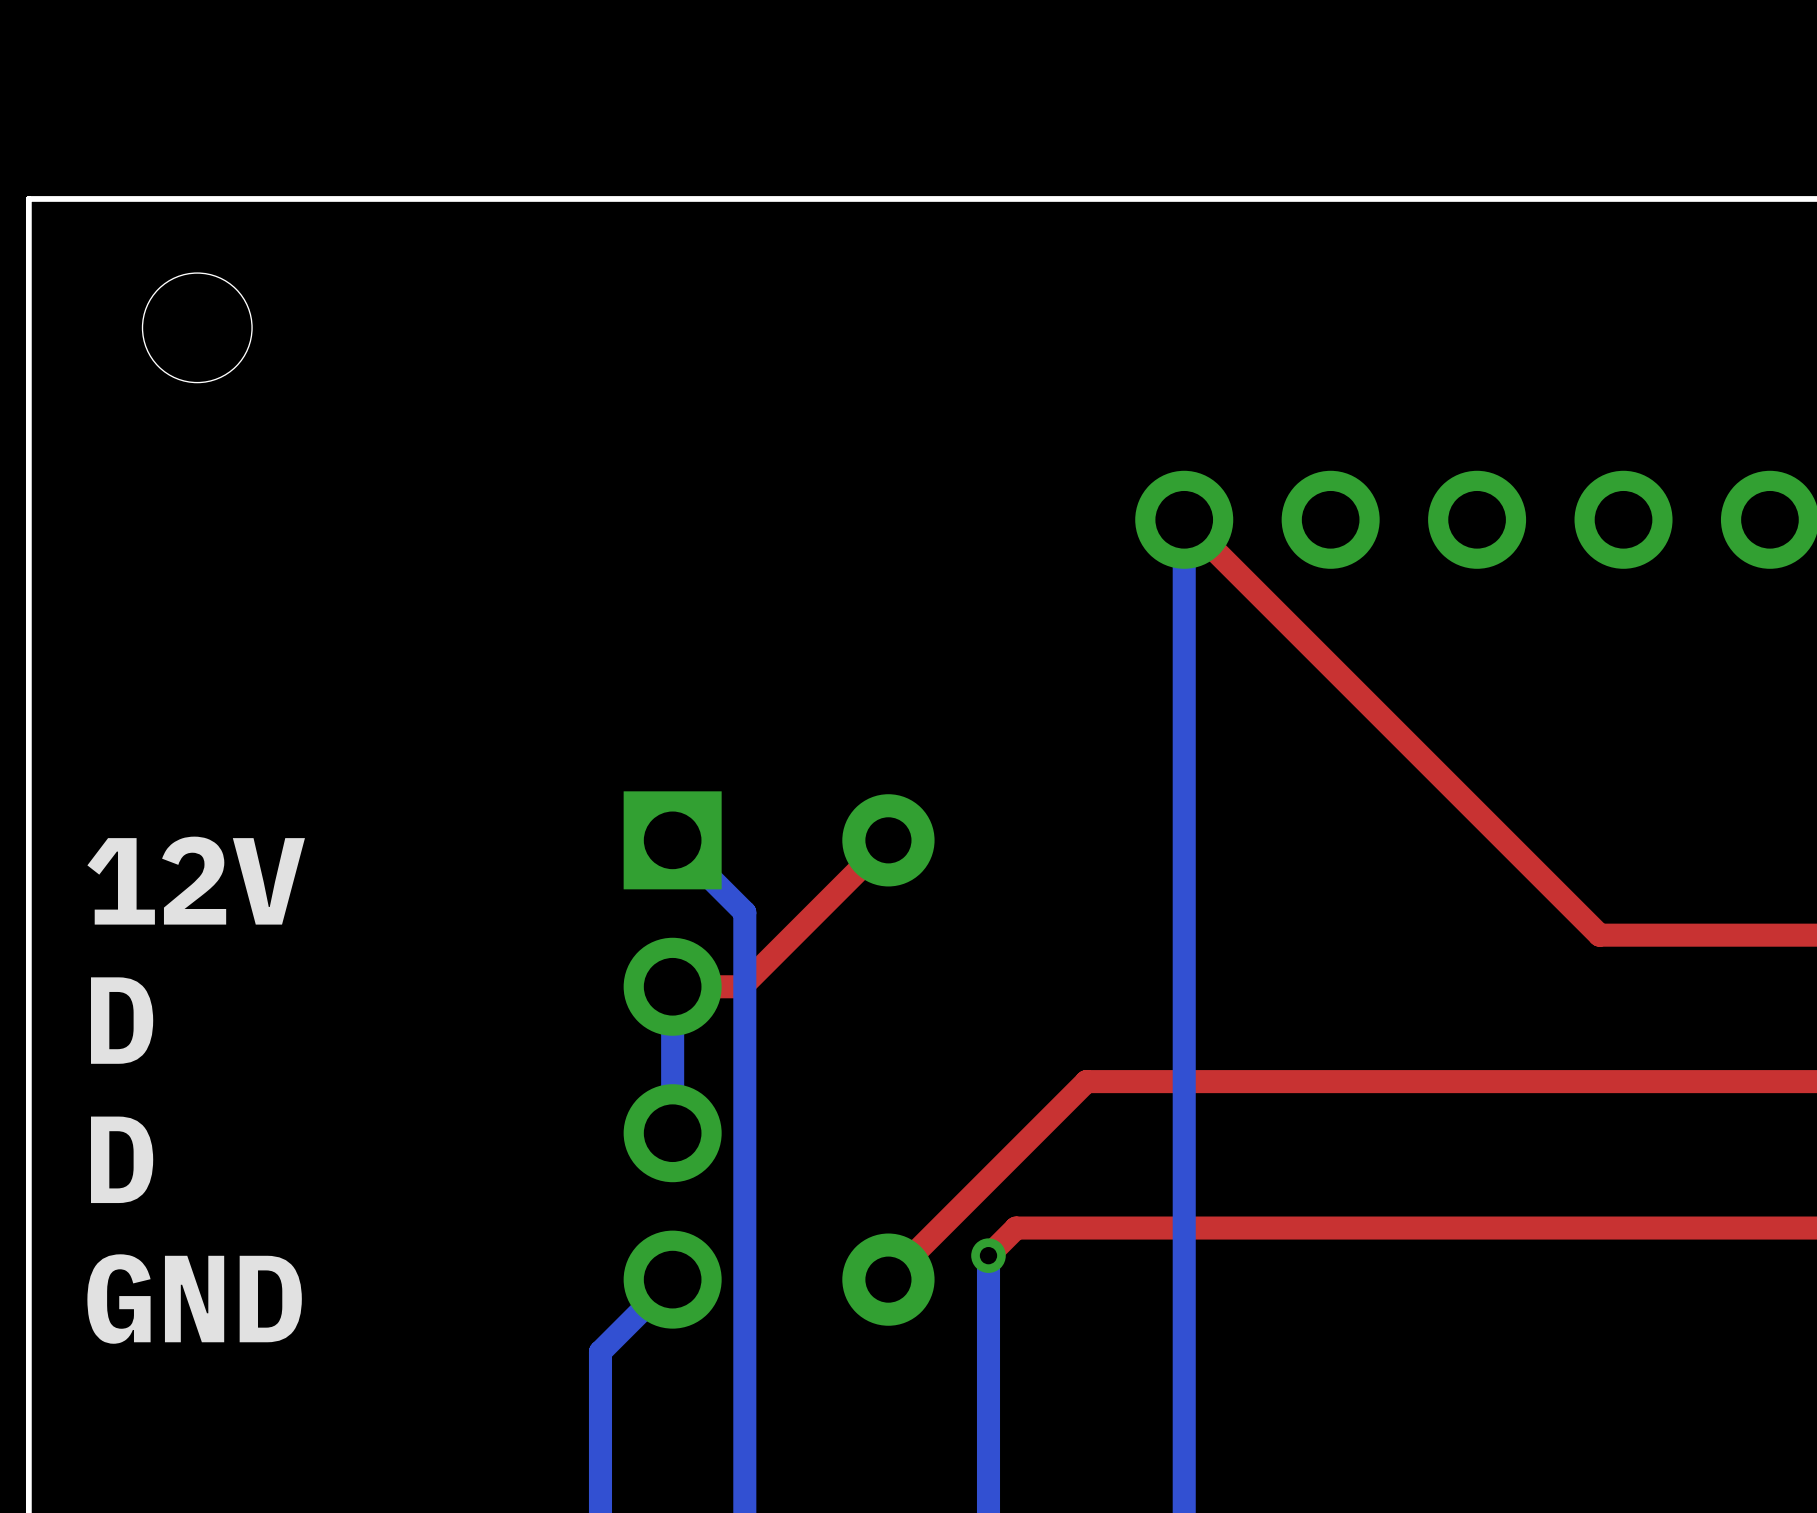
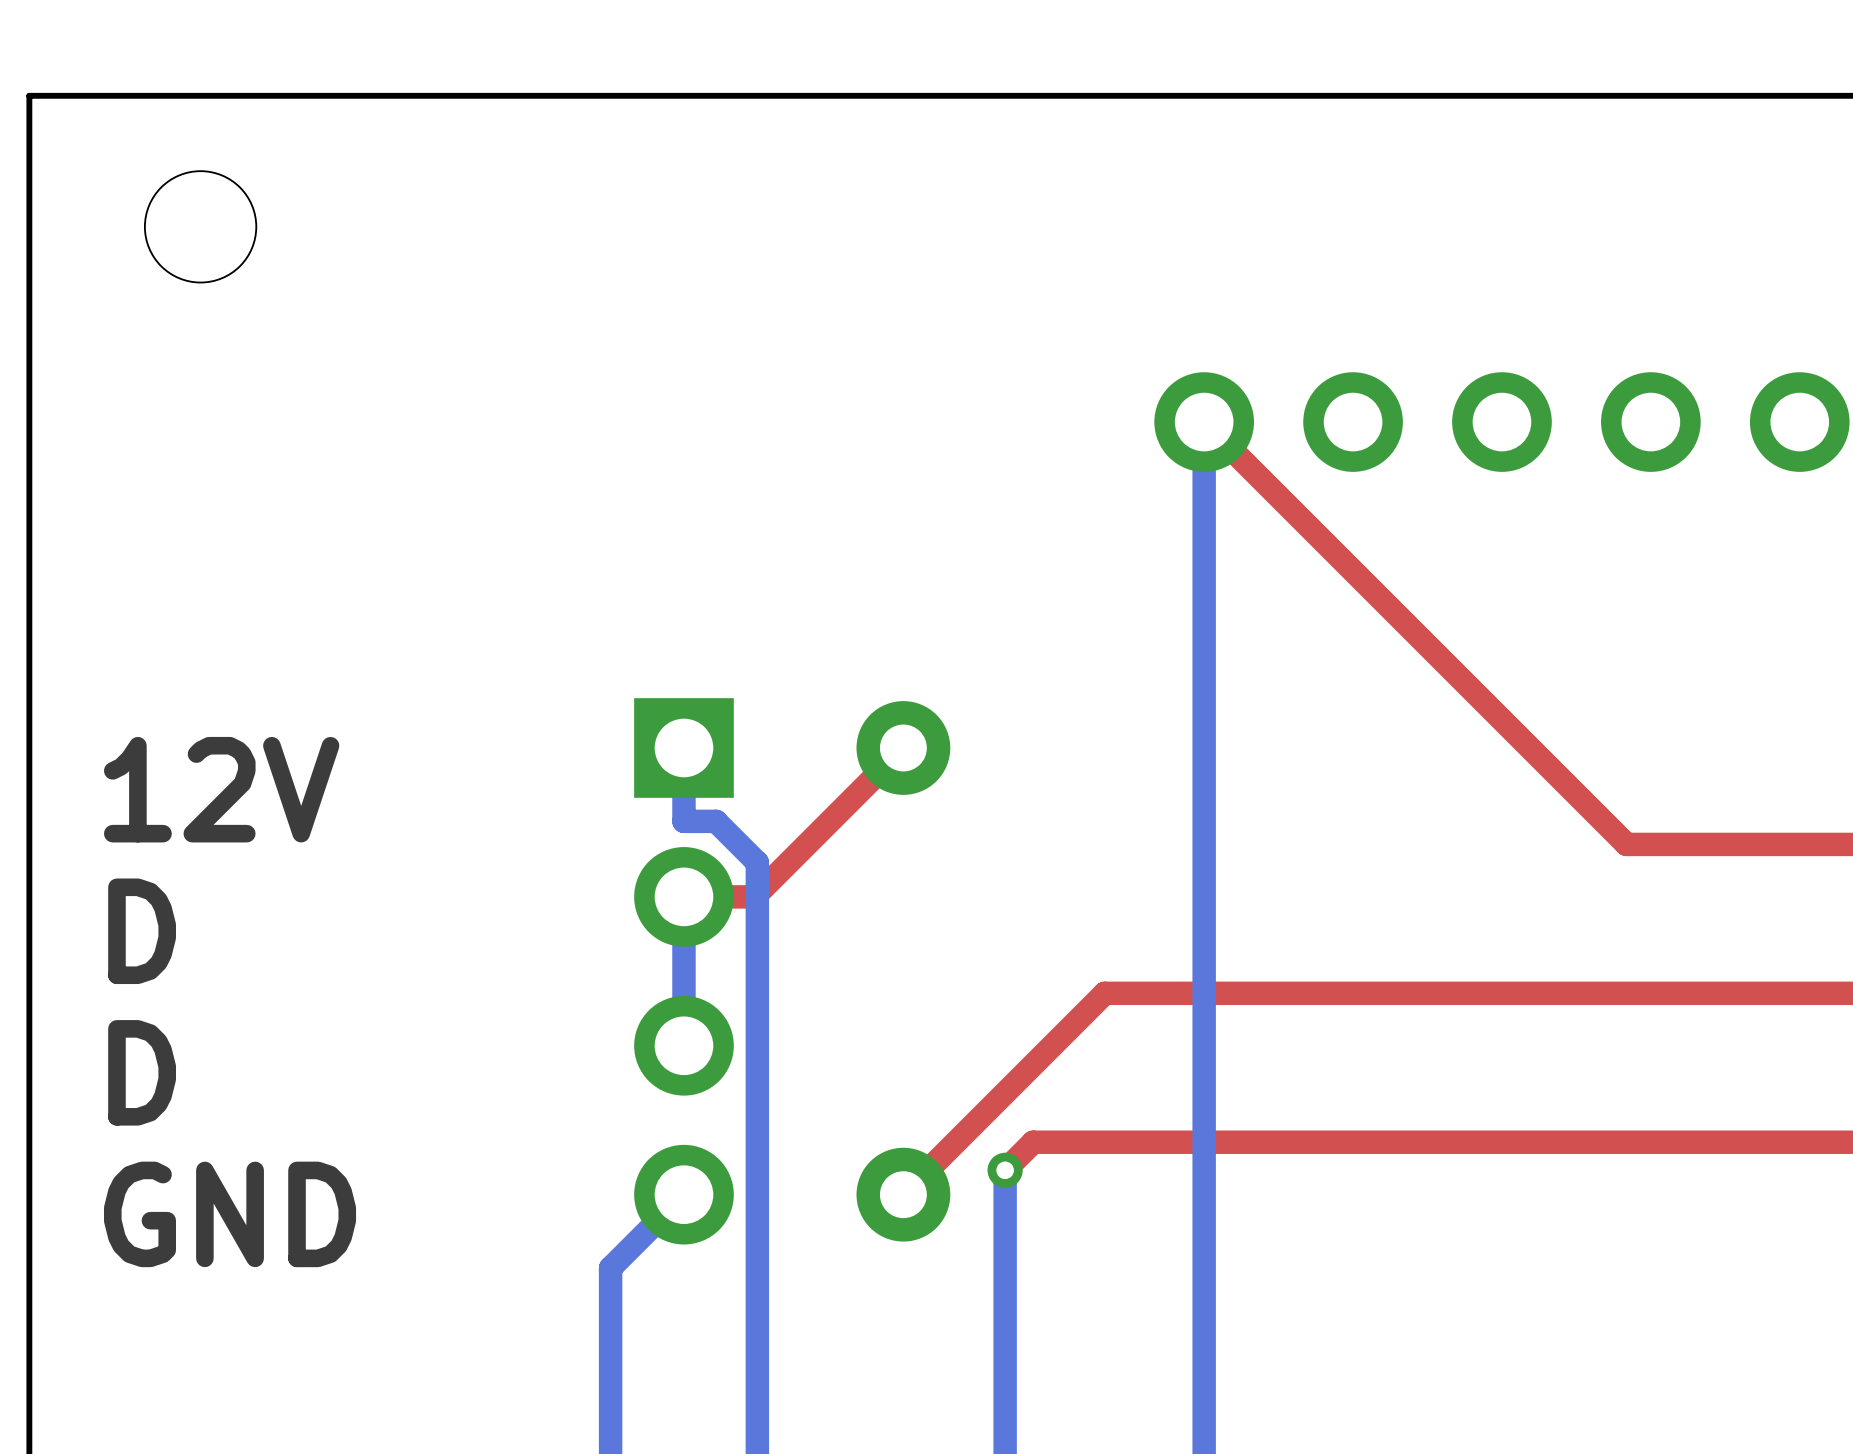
bottom track: (672, 840) (744, 912) (744, 953) -> (683, 747) (683, 821) (716, 821) (757, 862)

